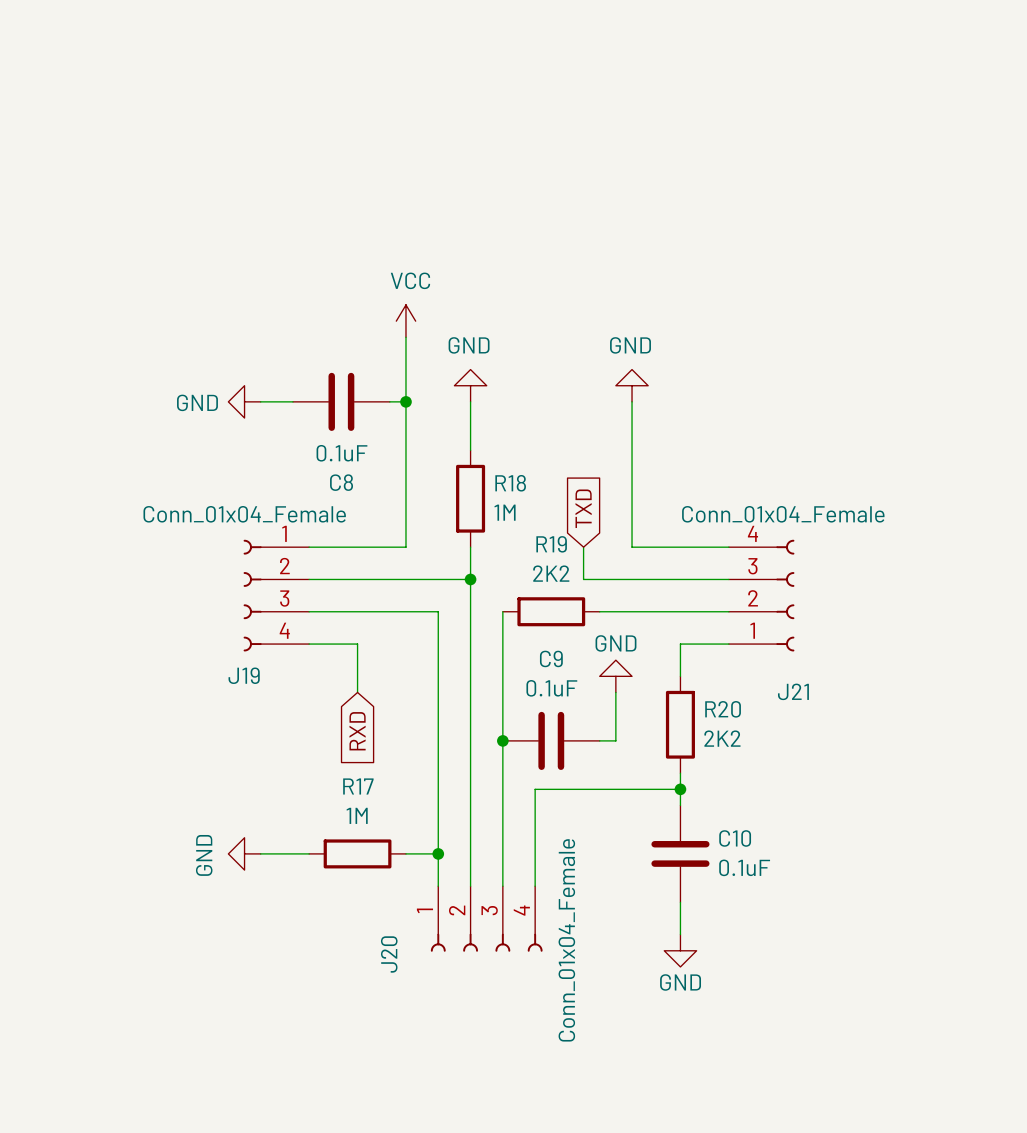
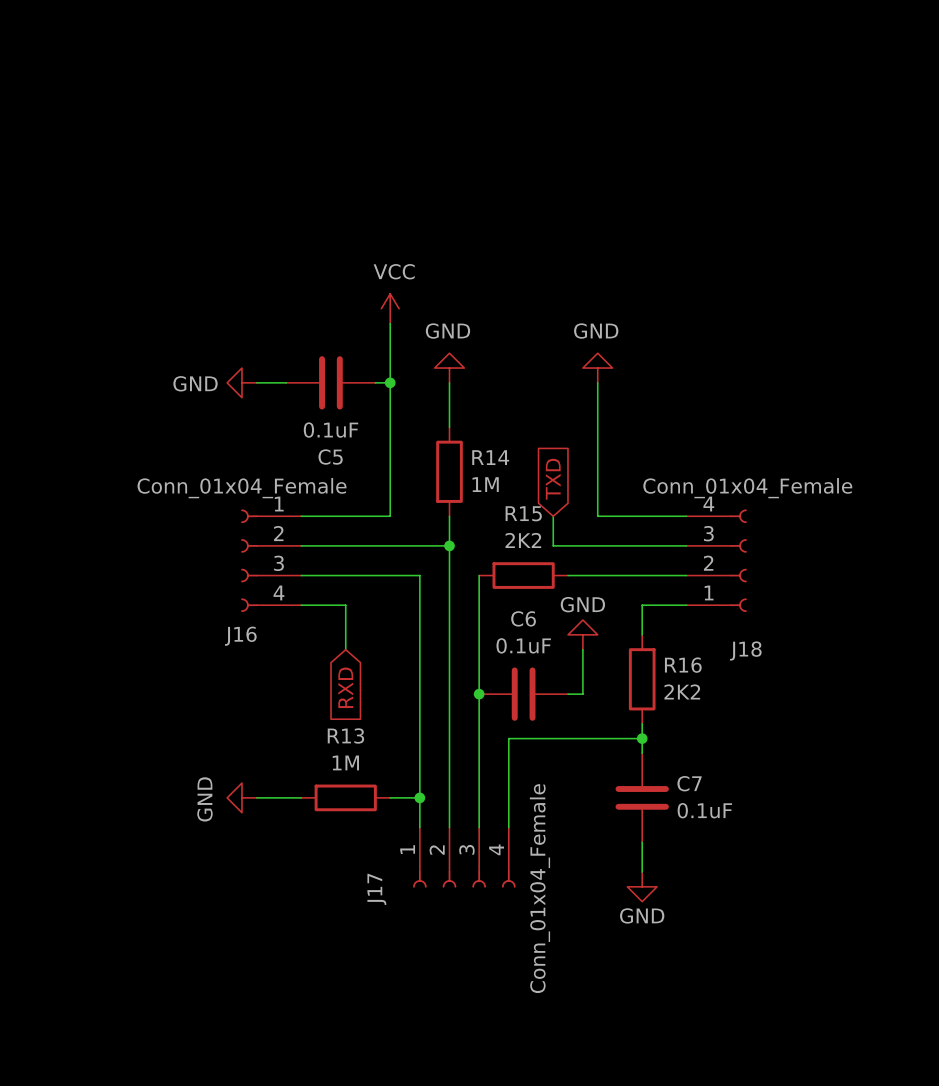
C8 name: C8 (341, 482) -> C5 (330, 457)
R18 name: R18 (510, 483) -> R14 (490, 457)
R19 name: R19 (551, 544) -> R15 (523, 513)
C9 name: C9 (551, 658) -> C6 (523, 618)
J19 name: J19 (244, 675) -> J16 (240, 636)
J21 name: J21 (793, 691) -> J18 (745, 651)
R20 name: R20 (723, 709) -> R16 (683, 665)
R17 name: R17 (358, 786) -> R13 (345, 735)
C10 name: C10 (735, 838) -> C7 (689, 783)
J20 name: J20 (389, 954) -> J17 (376, 889)

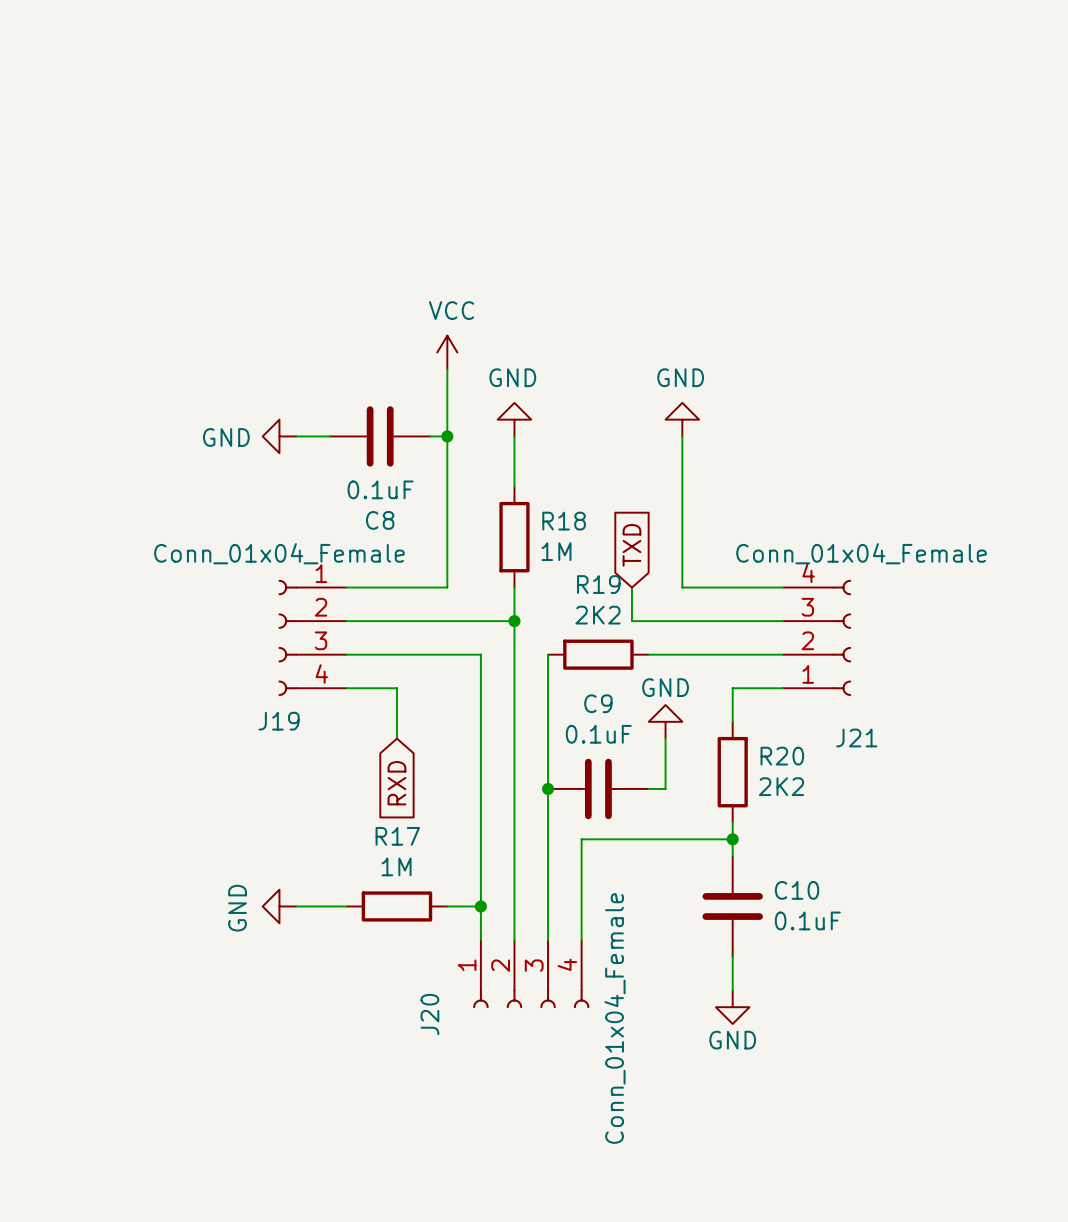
C5 name: C5 (330, 457) -> C8 (380, 520)
R14 name: R14 (490, 457) -> R18 (564, 521)
R15 name: R15 (523, 513) -> R19 (598, 584)
C6 name: C6 (523, 618) -> C9 (598, 703)
J16 name: J16 (240, 636) -> J19 (279, 721)
J18 name: J18 (745, 651) -> J21 (856, 737)
R16 name: R16 (683, 665) -> R20 (782, 756)
R13 name: R13 (345, 735) -> R17 (397, 836)
C7 name: C7 (689, 783) -> C10 (797, 890)
J17 name: J17 (376, 889) -> J20 (429, 1014)

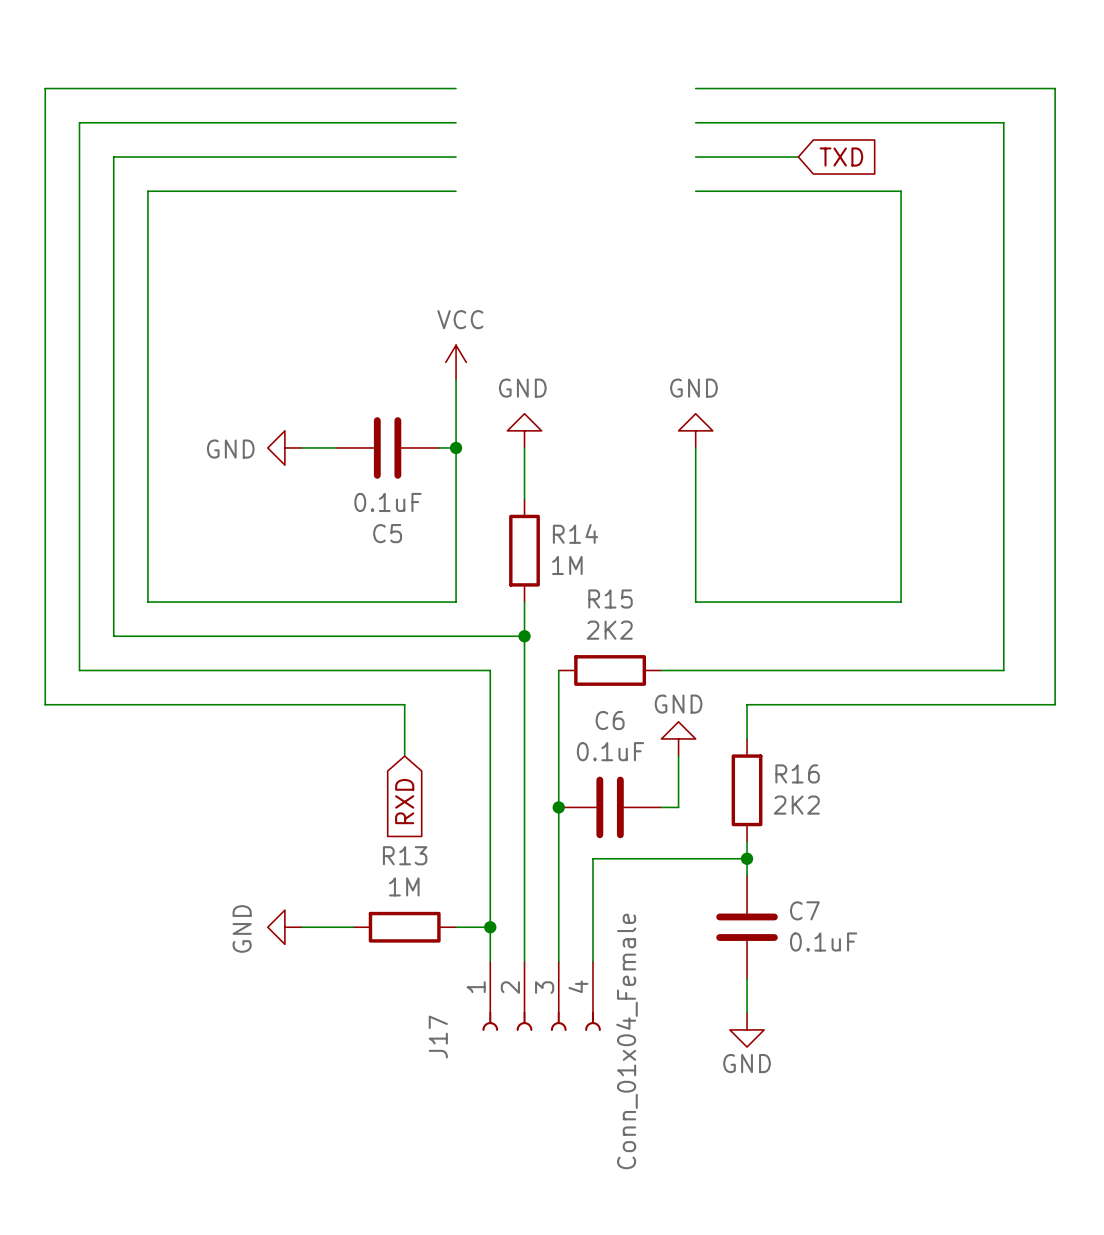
wire: none -> (456, 88) (45, 88) (45, 704) (353, 704)
wire: none -> (695, 88) (1055, 88) (1055, 704) (798, 704)
wire: none -> (456, 122) (79, 122) (79, 670) (353, 670)
wire: none -> (695, 122) (1003, 122) (1003, 670) (798, 670)
wire: none -> (456, 157) (113, 157) (113, 636) (353, 636)
wire: none -> (695, 157) (798, 157)
global label: none -> TXD (841, 157)
wire: none -> (456, 191) (147, 191) (147, 602) (353, 602)
wire: none -> (695, 191) (901, 191) (901, 602) (798, 602)
C8 name: C8 (380, 520) -> C5 (387, 533)
R18 name: R18 (564, 521) -> R14 (575, 533)
global label: TXD (631, 545) -> none
R19 name: R19 (598, 584) -> R15 (610, 598)
wire: (631, 587) (631, 621) (783, 621) -> none
J19: Conn_01x04_Female (312, 637) -> none
J21: Conn_01x04_Female (817, 637) -> none
C9 name: C9 (598, 703) -> C6 (610, 720)
R20 name: R20 (782, 756) -> R16 (797, 773)
R17 name: R17 (397, 836) -> R13 (405, 855)
C10 name: C10 (797, 890) -> C7 (804, 910)
J20 name: J20 (429, 1014) -> J17 (438, 1036)

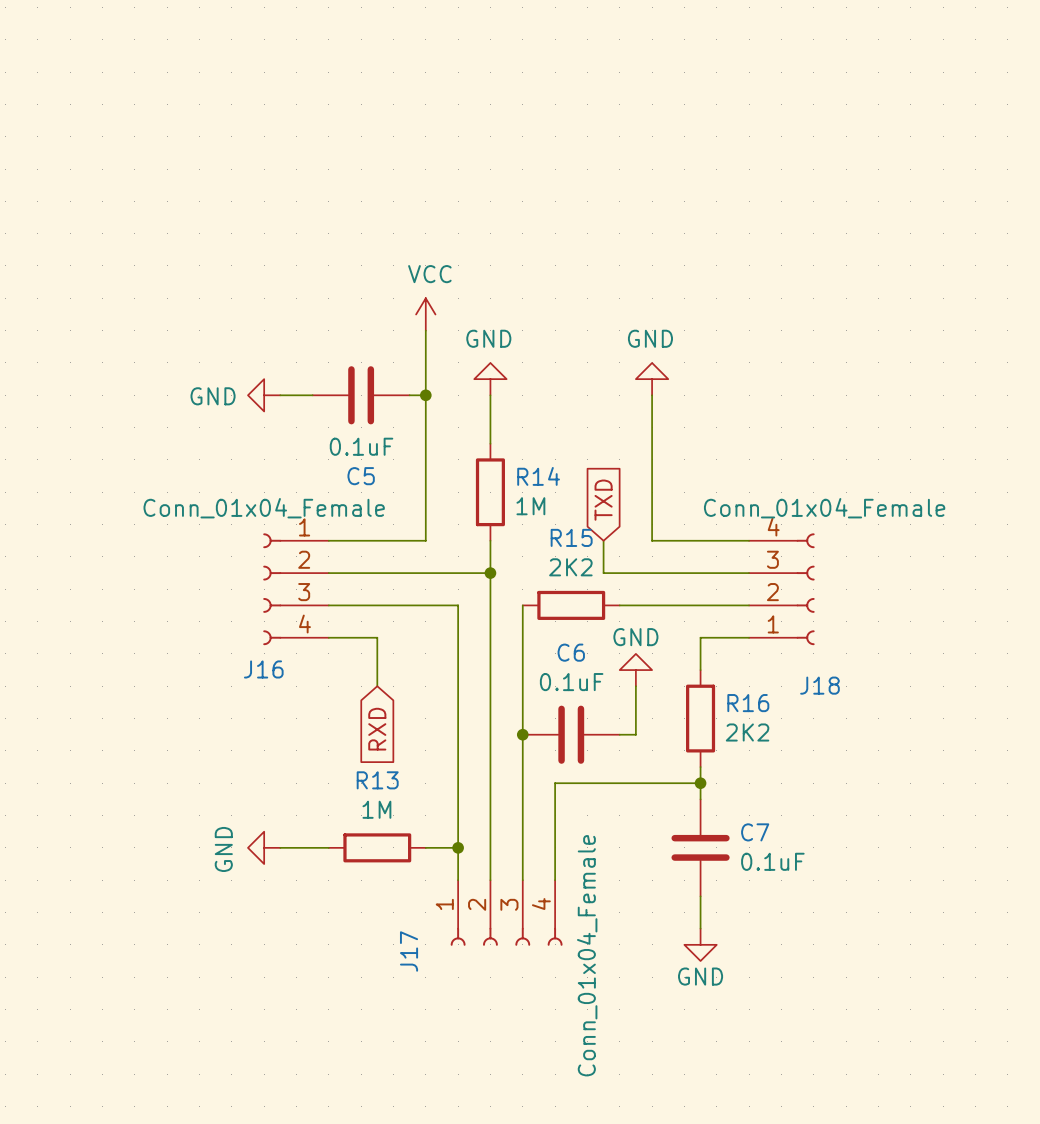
wire: (456, 88) (45, 88) (45, 704) (353, 704) -> none
wire: (695, 88) (1055, 88) (1055, 704) (798, 704) -> none
wire: (456, 122) (79, 122) (79, 670) (353, 670) -> none
wire: (695, 122) (1003, 122) (1003, 670) (798, 670) -> none
wire: (456, 157) (113, 157) (113, 636) (353, 636) -> none
wire: (695, 157) (798, 157) -> none
global label: TXD (841, 157) -> none
wire: (456, 191) (147, 191) (147, 602) (353, 602) -> none
wire: (695, 191) (901, 191) (901, 602) (798, 602) -> none
global label: none -> TXD (603, 500)
wire: none -> (603, 540) (603, 573) (749, 573)
J16: none -> Conn_01x04_Female (296, 589)
J18: none -> Conn_01x04_Female (781, 589)

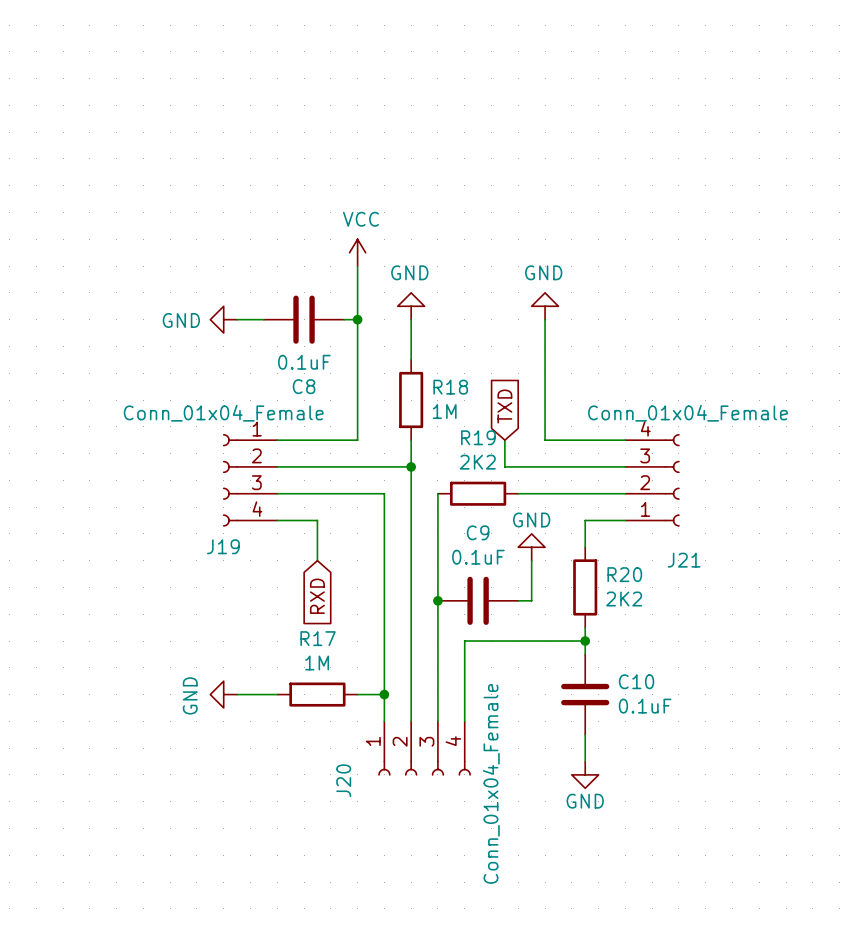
C5 name: C5 (361, 476) -> C8 (304, 386)
R14 name: R14 (538, 476) -> R18 (450, 387)
R15 name: R15 (571, 537) -> R19 (478, 437)
C6 name: C6 (571, 652) -> C9 (478, 532)
J16 name: J16 (263, 669) -> J19 (223, 546)
J18 name: J18 (819, 685) -> J21 (684, 560)
R16 name: R16 (748, 703) -> R20 (624, 574)
R13 name: R13 (377, 780) -> R17 (318, 638)
C7 name: C7 (755, 832) -> C10 (636, 681)
J17 name: J17 (409, 951) -> J20 (343, 780)

